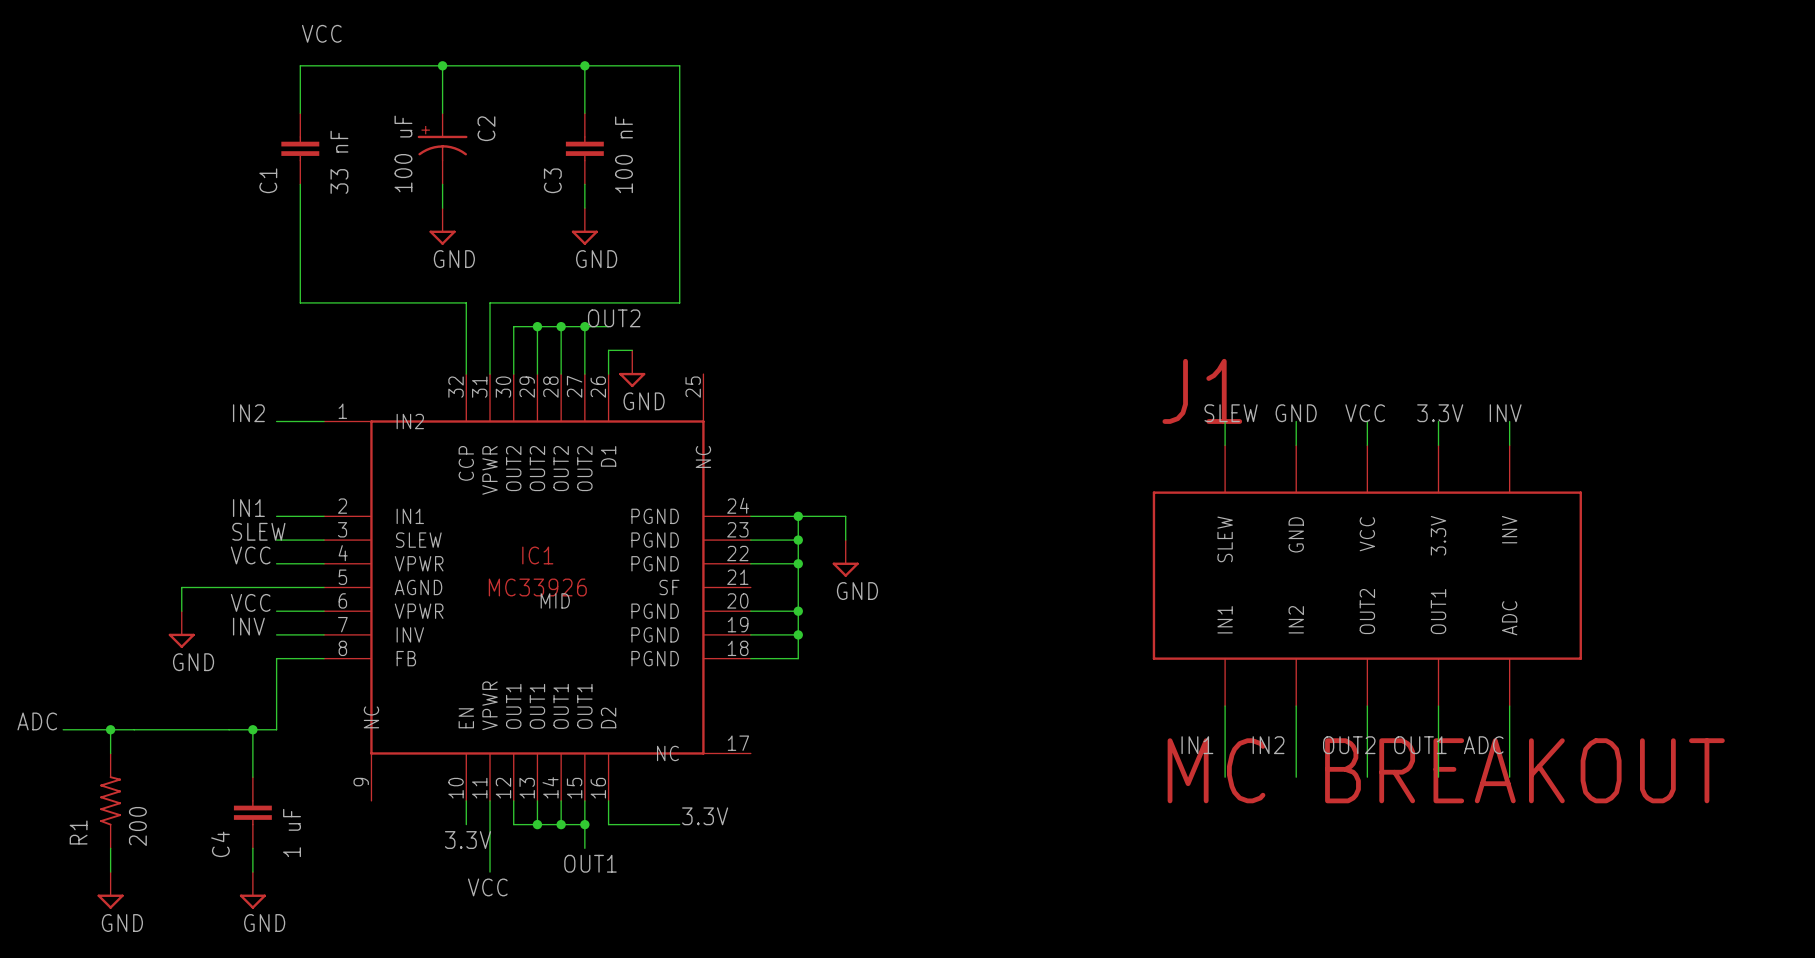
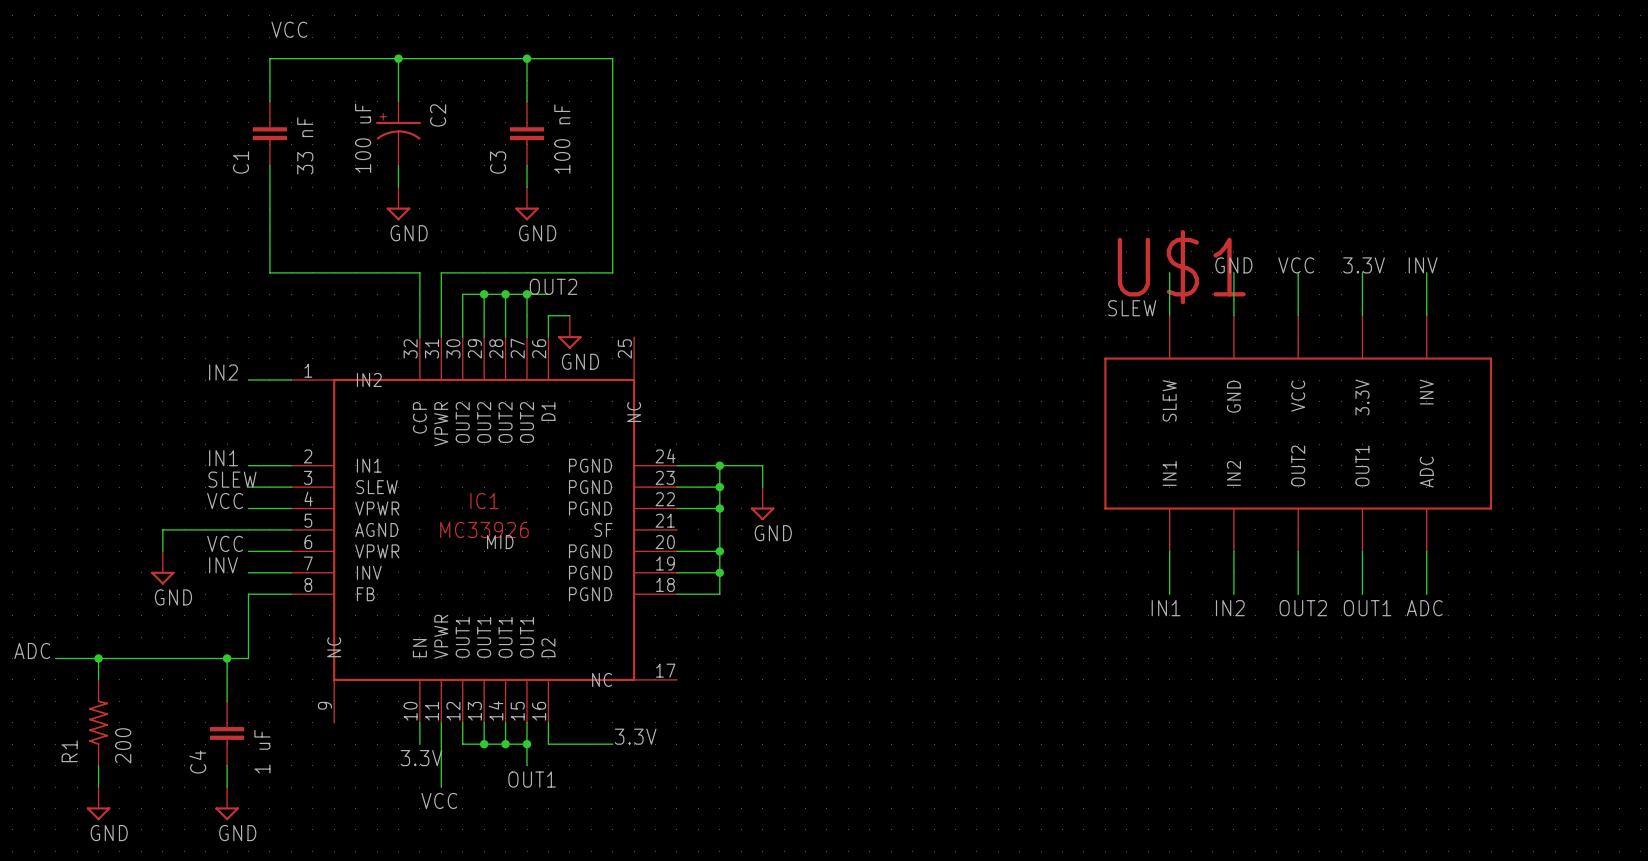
wire: none -> (1169, 272) (1169, 315)
wire: none -> (1233, 272) (1233, 315)
wire: none -> (1298, 272) (1298, 315)
wire: none -> (1362, 272) (1362, 315)
wire: none -> (1426, 272) (1426, 315)
label position: SLEW (1231, 413) -> SLEW (1132, 308)
label position: GND (1296, 413) -> GND (1233, 265)
label position: VCC (1365, 413) -> VCC (1296, 265)
label position: 3.3V (1440, 413) -> 3.3V (1364, 265)
label position: INV (1505, 413) -> INV (1423, 265)
wire: (1296, 421) (1296, 445) -> none
wire: (1367, 421) (1367, 445) -> none
wire: (1438, 421) (1438, 445) -> none
wire: (1509, 421) (1509, 445) -> none
U$1: none -> (1298, 433)
J1: MC BREAKOUT (1367, 575) -> none
wire: none -> (1169, 551) (1169, 594)
wire: none -> (1233, 551) (1233, 594)
wire: none -> (1298, 551) (1298, 594)
wire: none -> (1362, 551) (1362, 594)
wire: (1225, 706) (1225, 777) -> none
wire: (1296, 706) (1296, 777) -> none
wire: (1367, 706) (1367, 777) -> none
wire: (1438, 706) (1438, 777) -> none
wire: (1509, 706) (1509, 777) -> none
label position: IN1 (1197, 745) -> IN1 (1166, 608)
label position: IN2 (1268, 745) -> IN2 (1230, 608)
label position: OUT2 (1349, 745) -> OUT2 (1303, 608)
label position: OUT1 (1420, 745) -> OUT1 (1367, 608)
label position: ADC (1483, 745) -> ADC (1424, 608)

